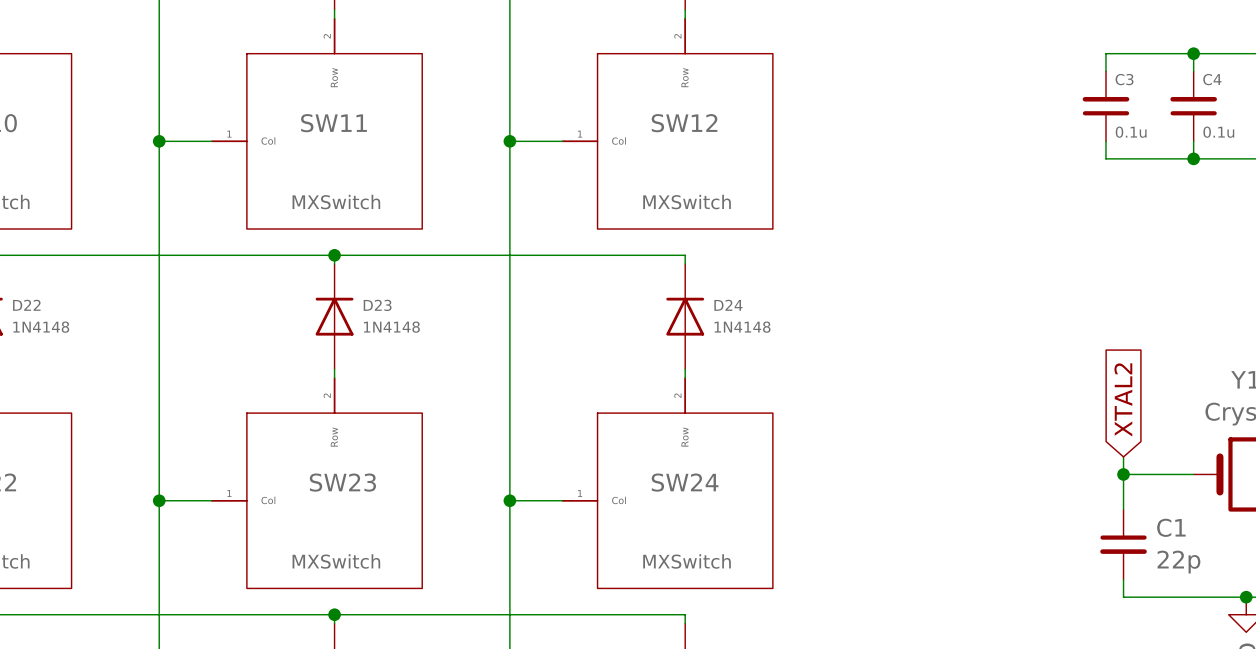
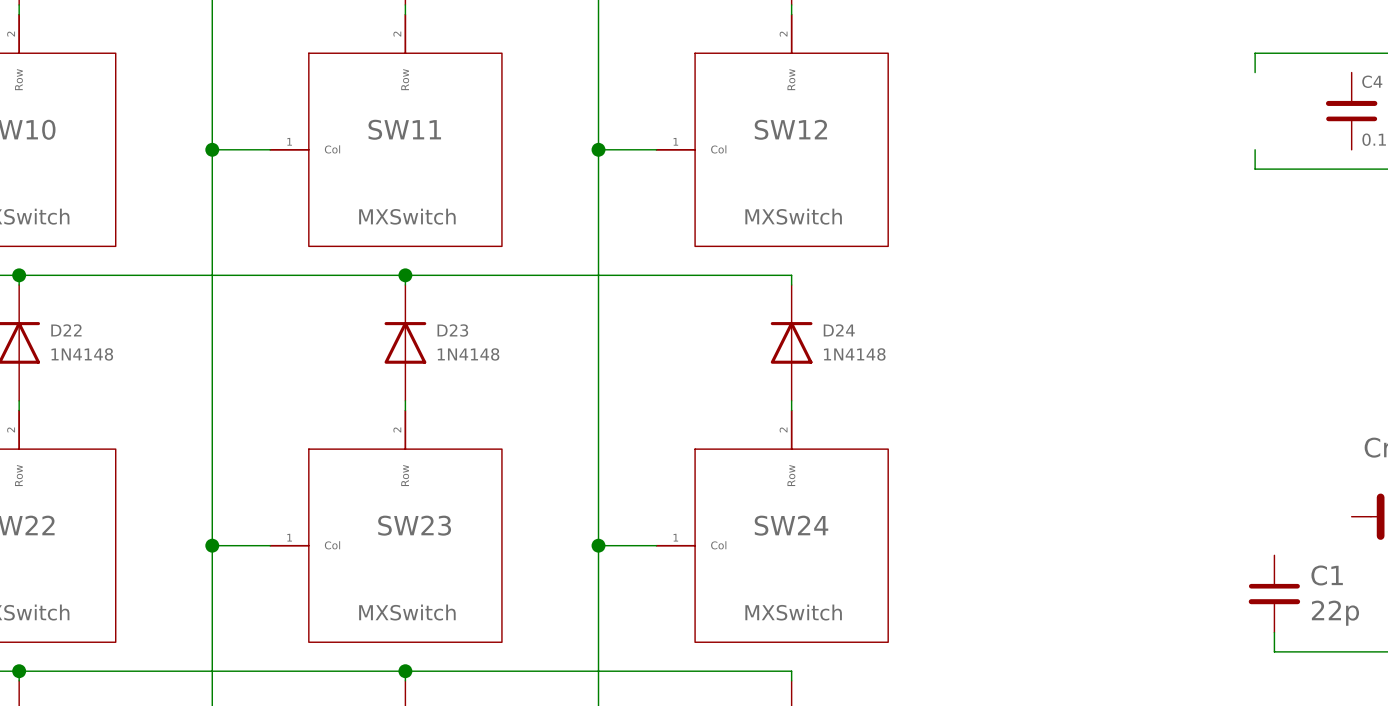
wire: (1193, 53) (1193, 71) -> none
junction: (1193, 53) -> none
C3: 0.1u (1105, 106) -> none
wire: (1193, 141) (1193, 158) -> none
junction: (1193, 158) -> none
global label: XTAL2 (1123, 399) -> none
wire: (1123, 456) (1123, 509) -> none
wire: (1123, 474) (1193, 474) -> none
junction: (1123, 474) -> none

